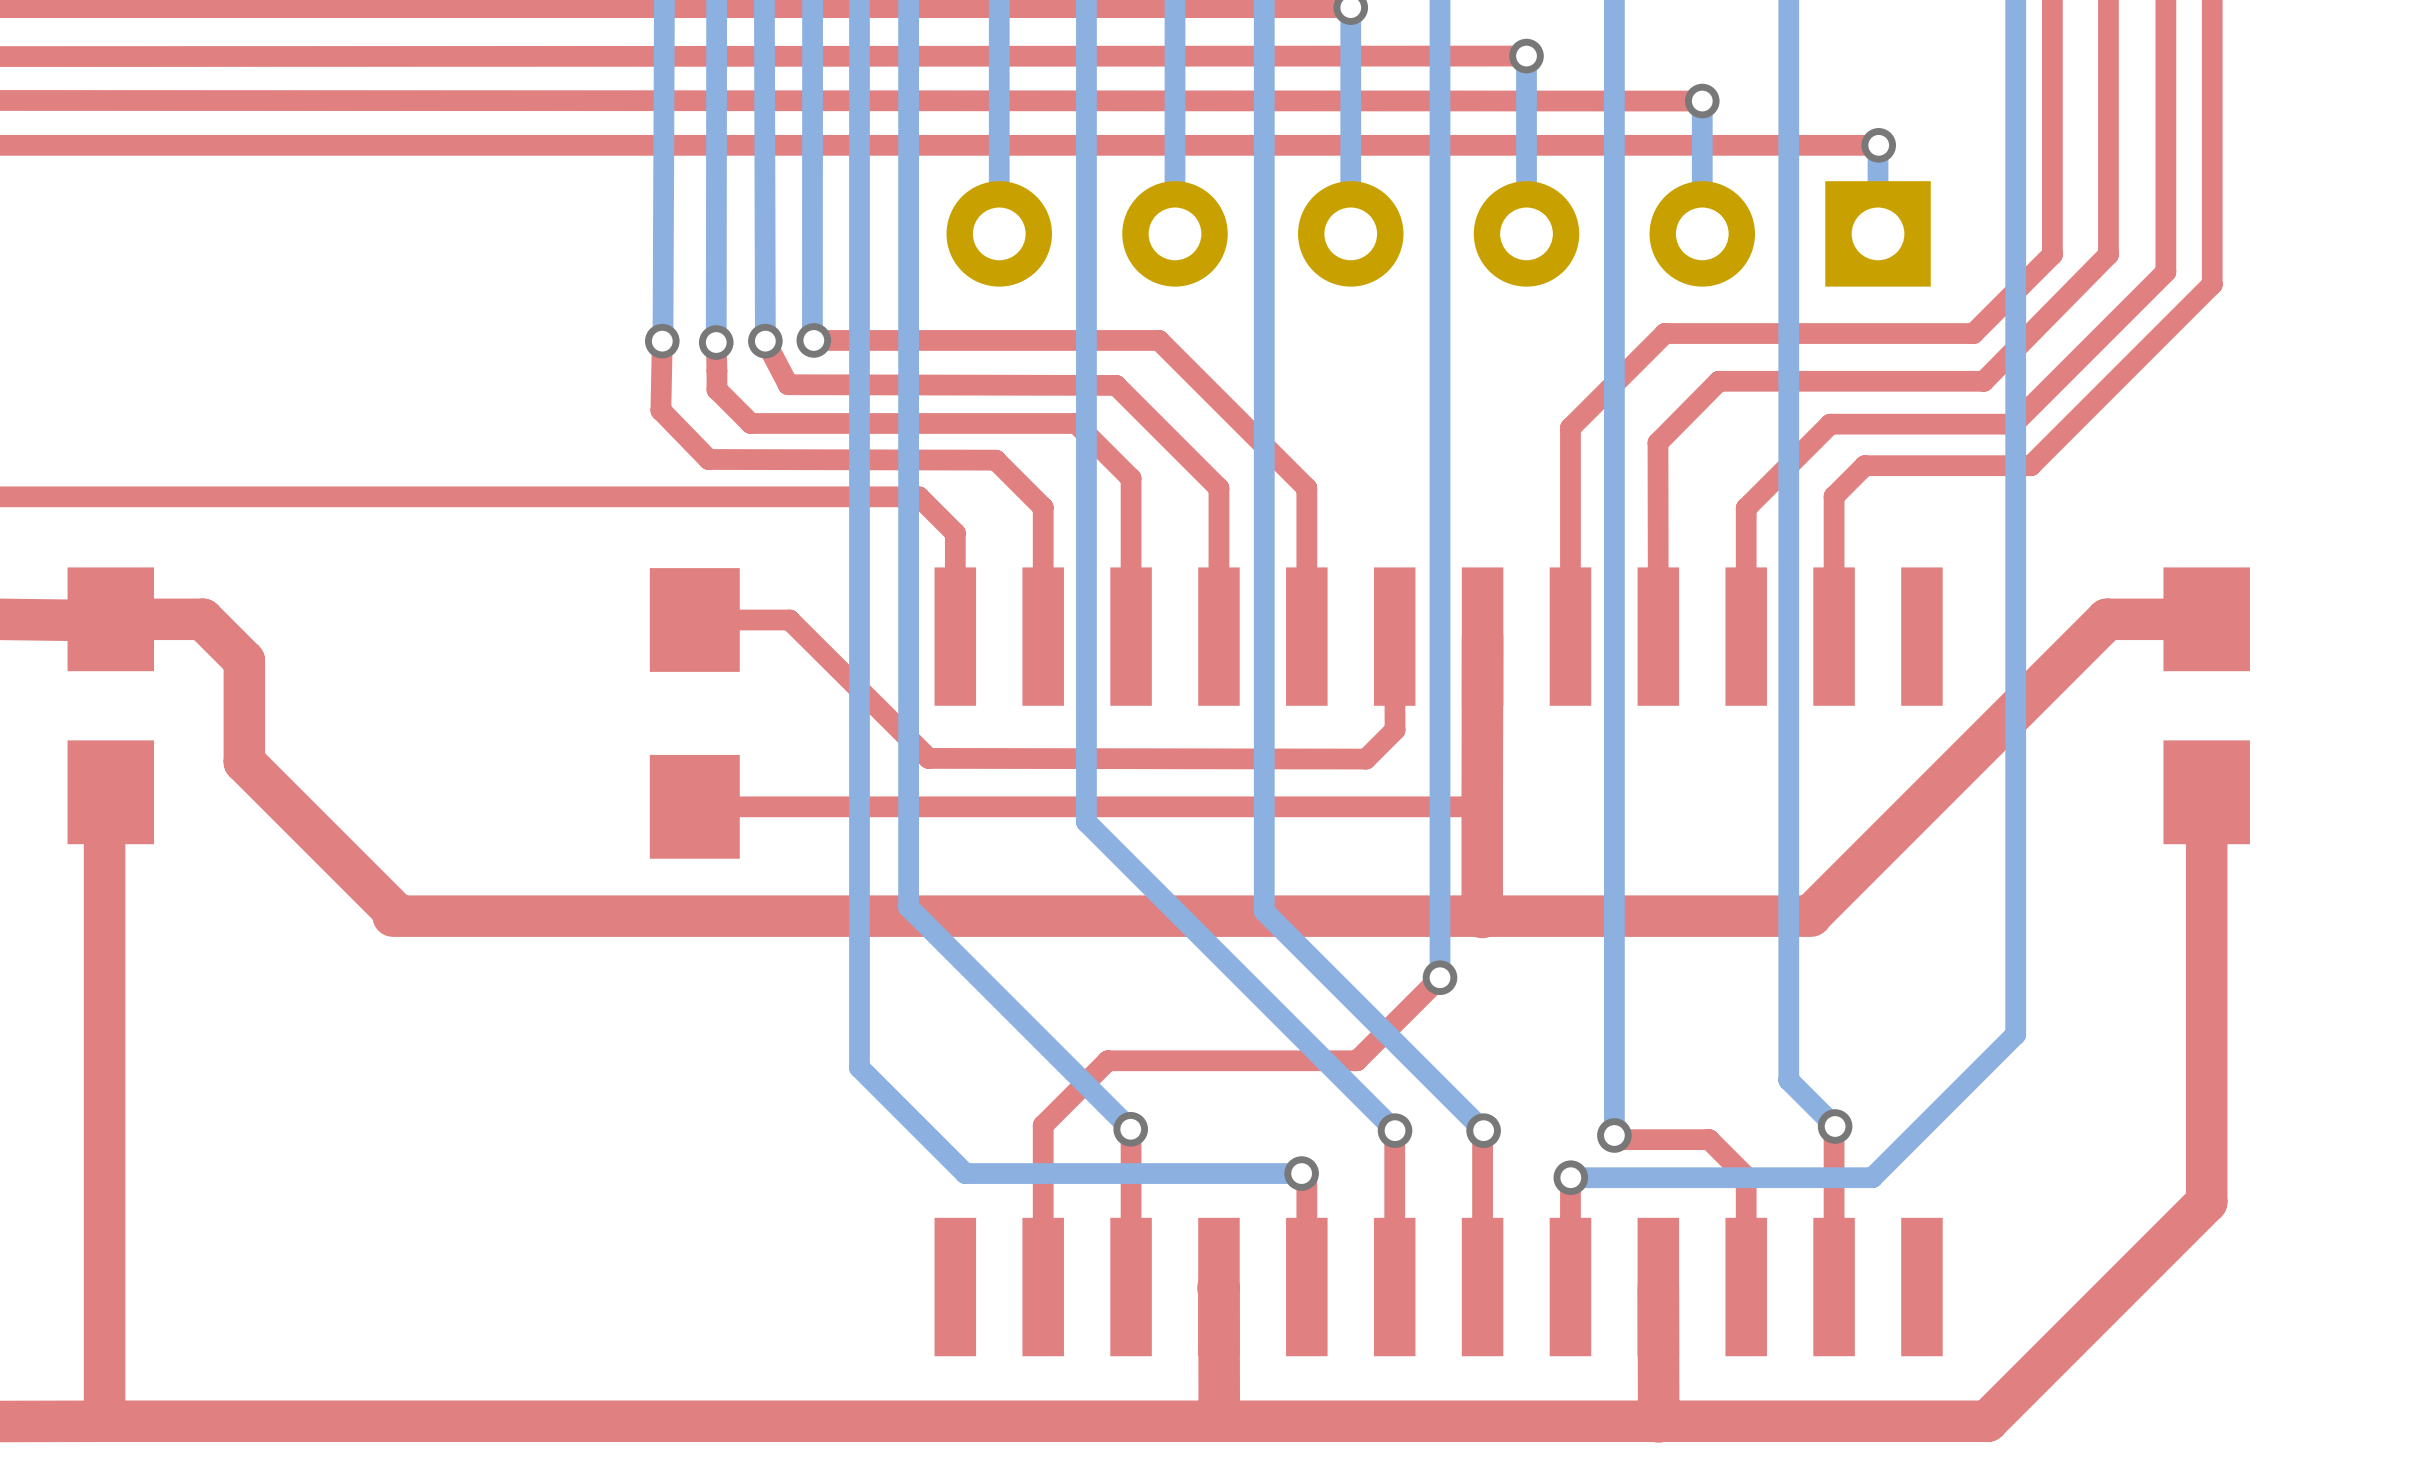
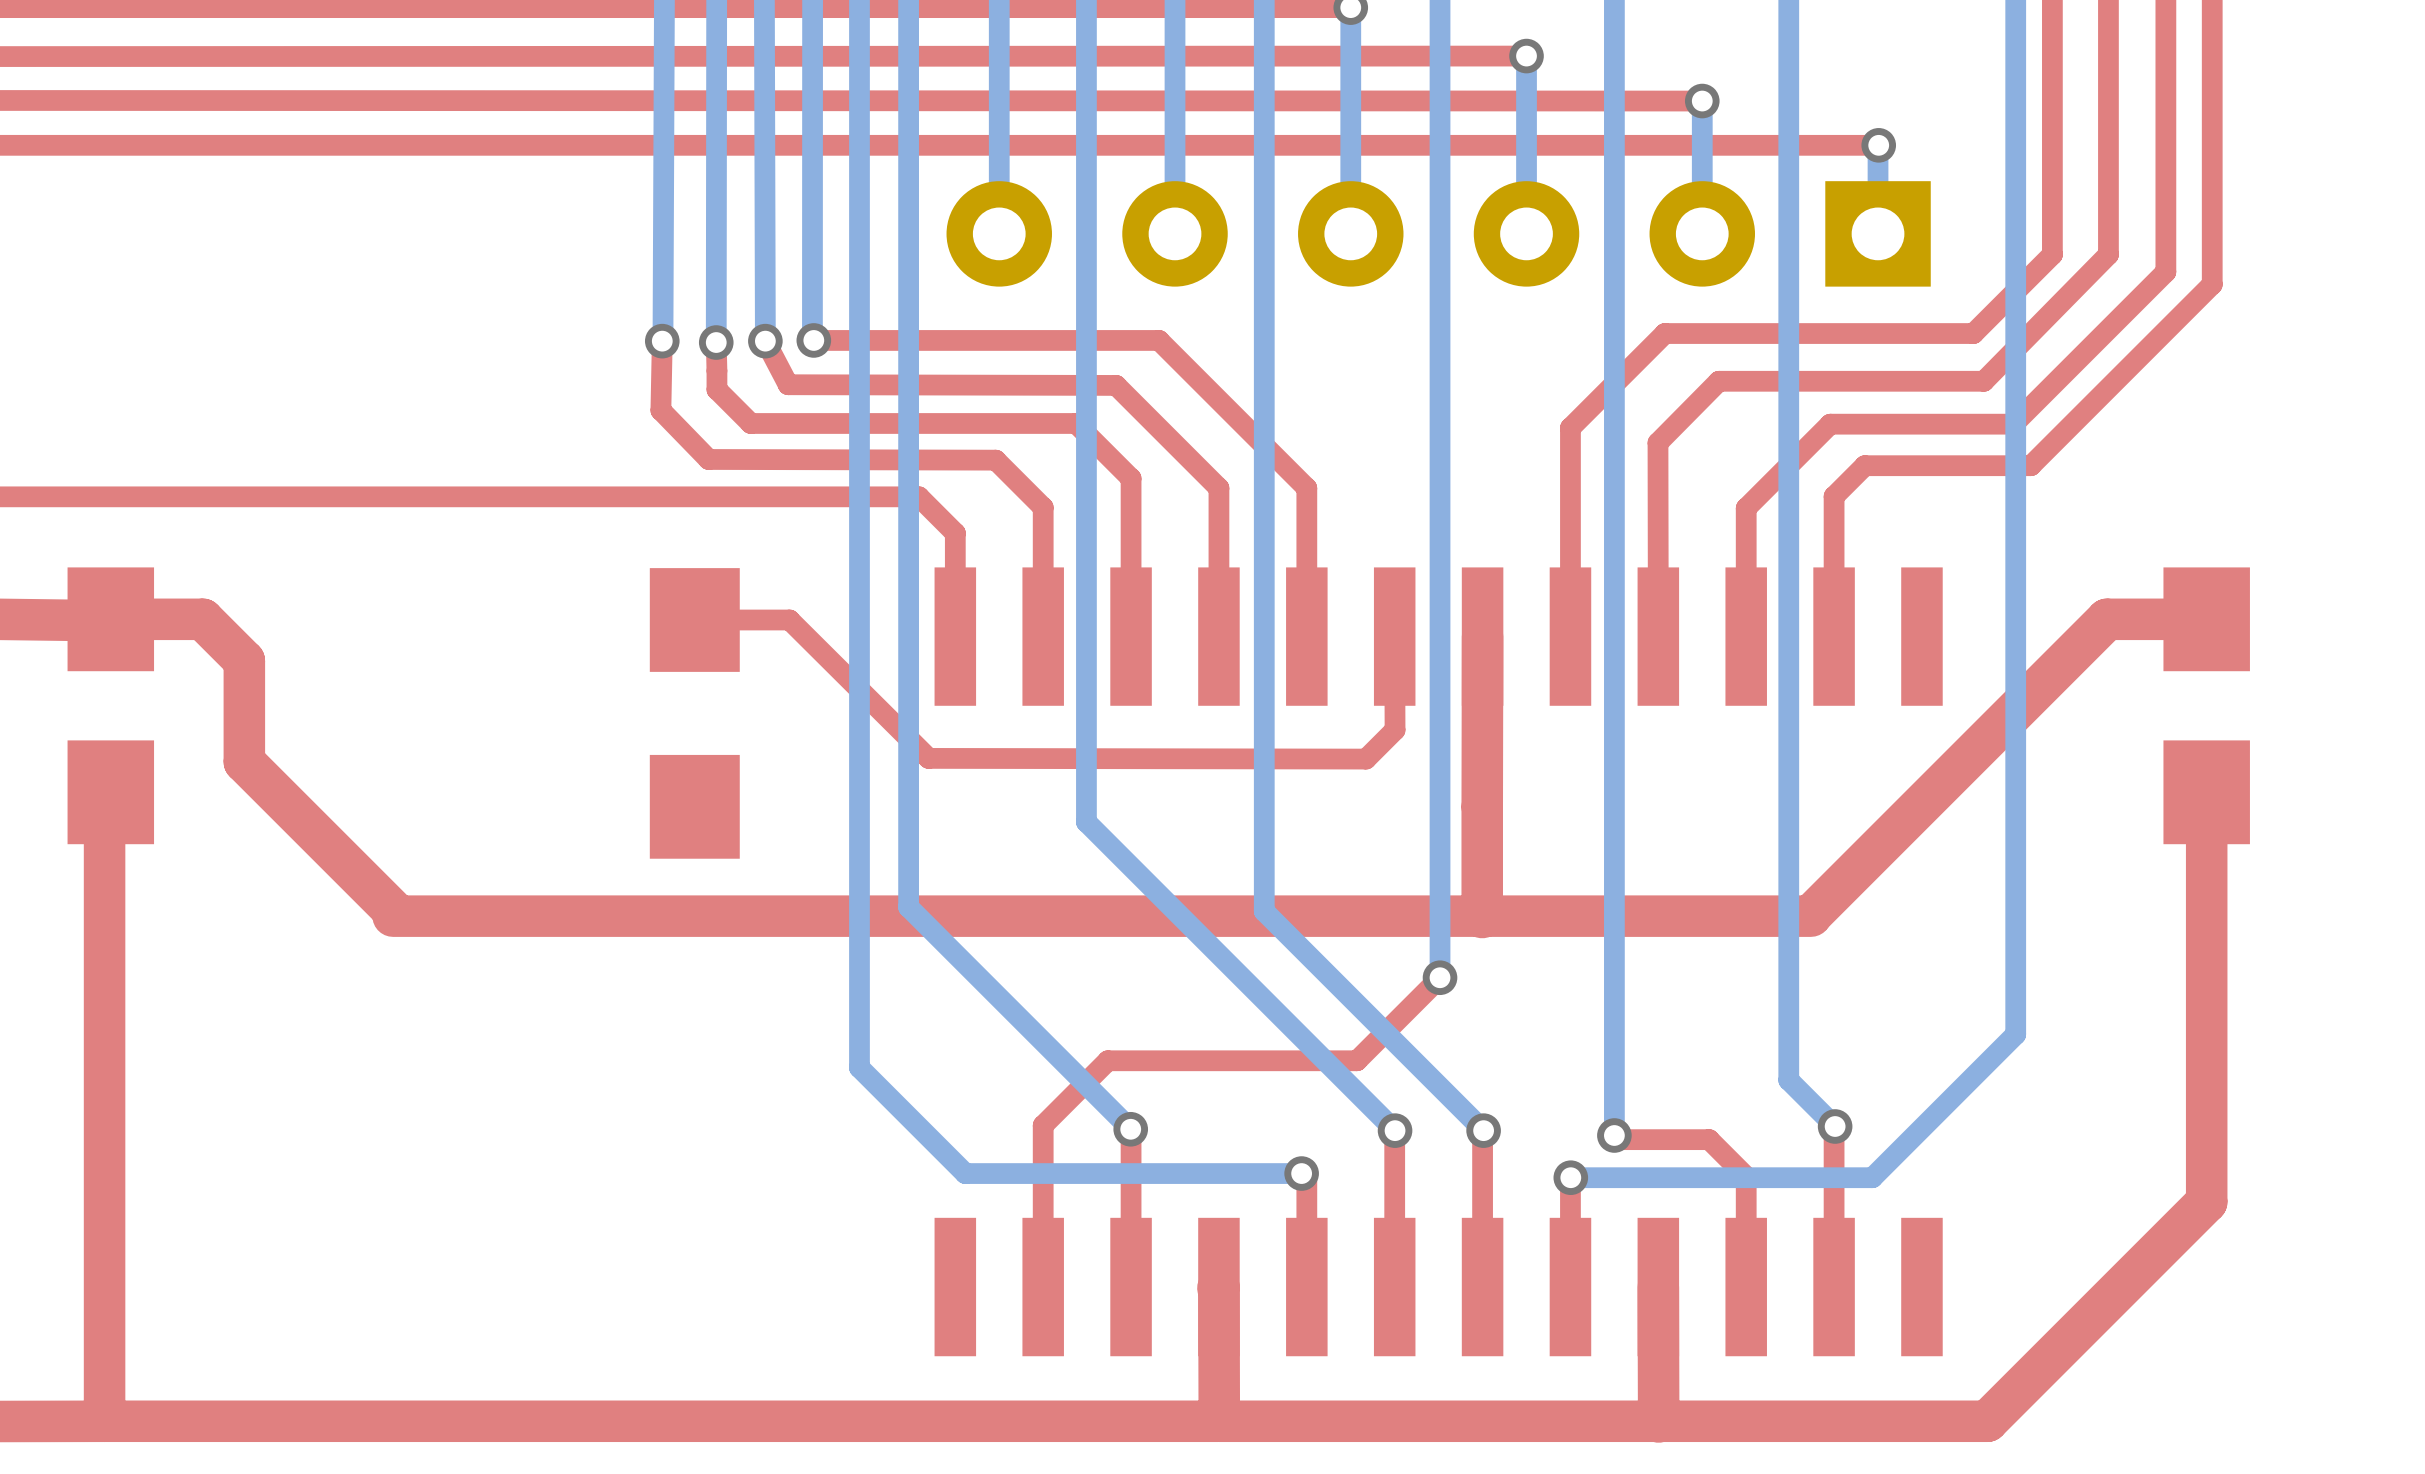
top track: (1482, 806) (697, 806) -> none

